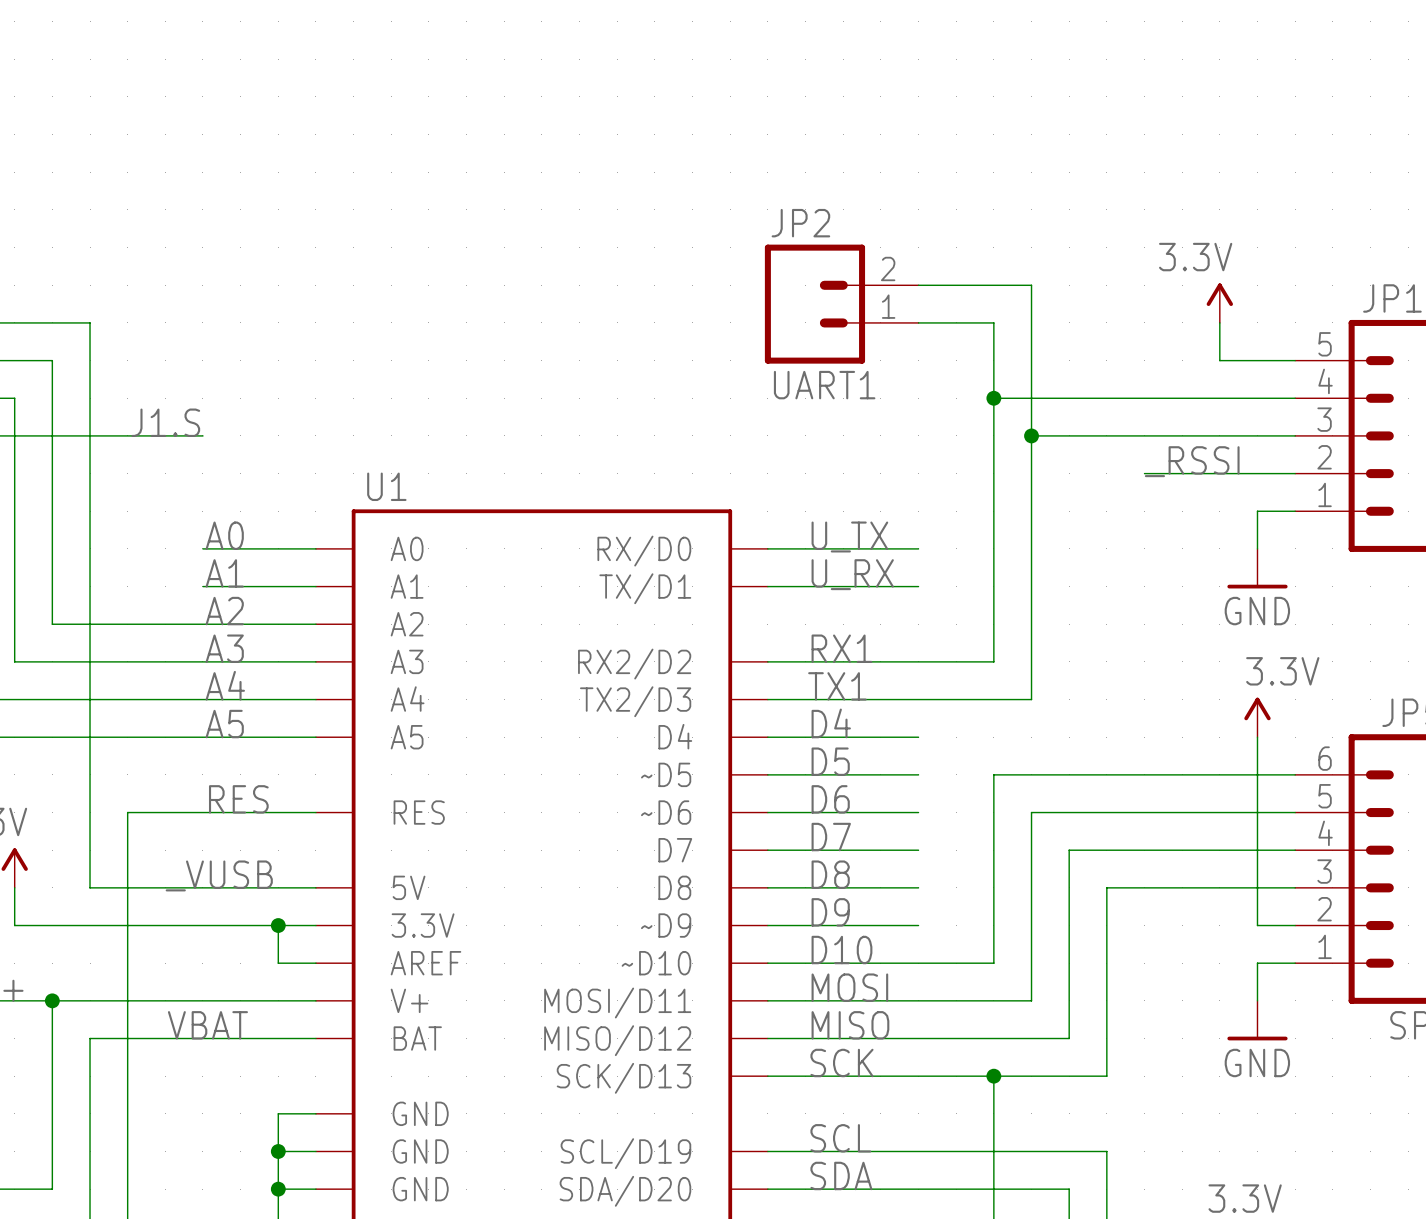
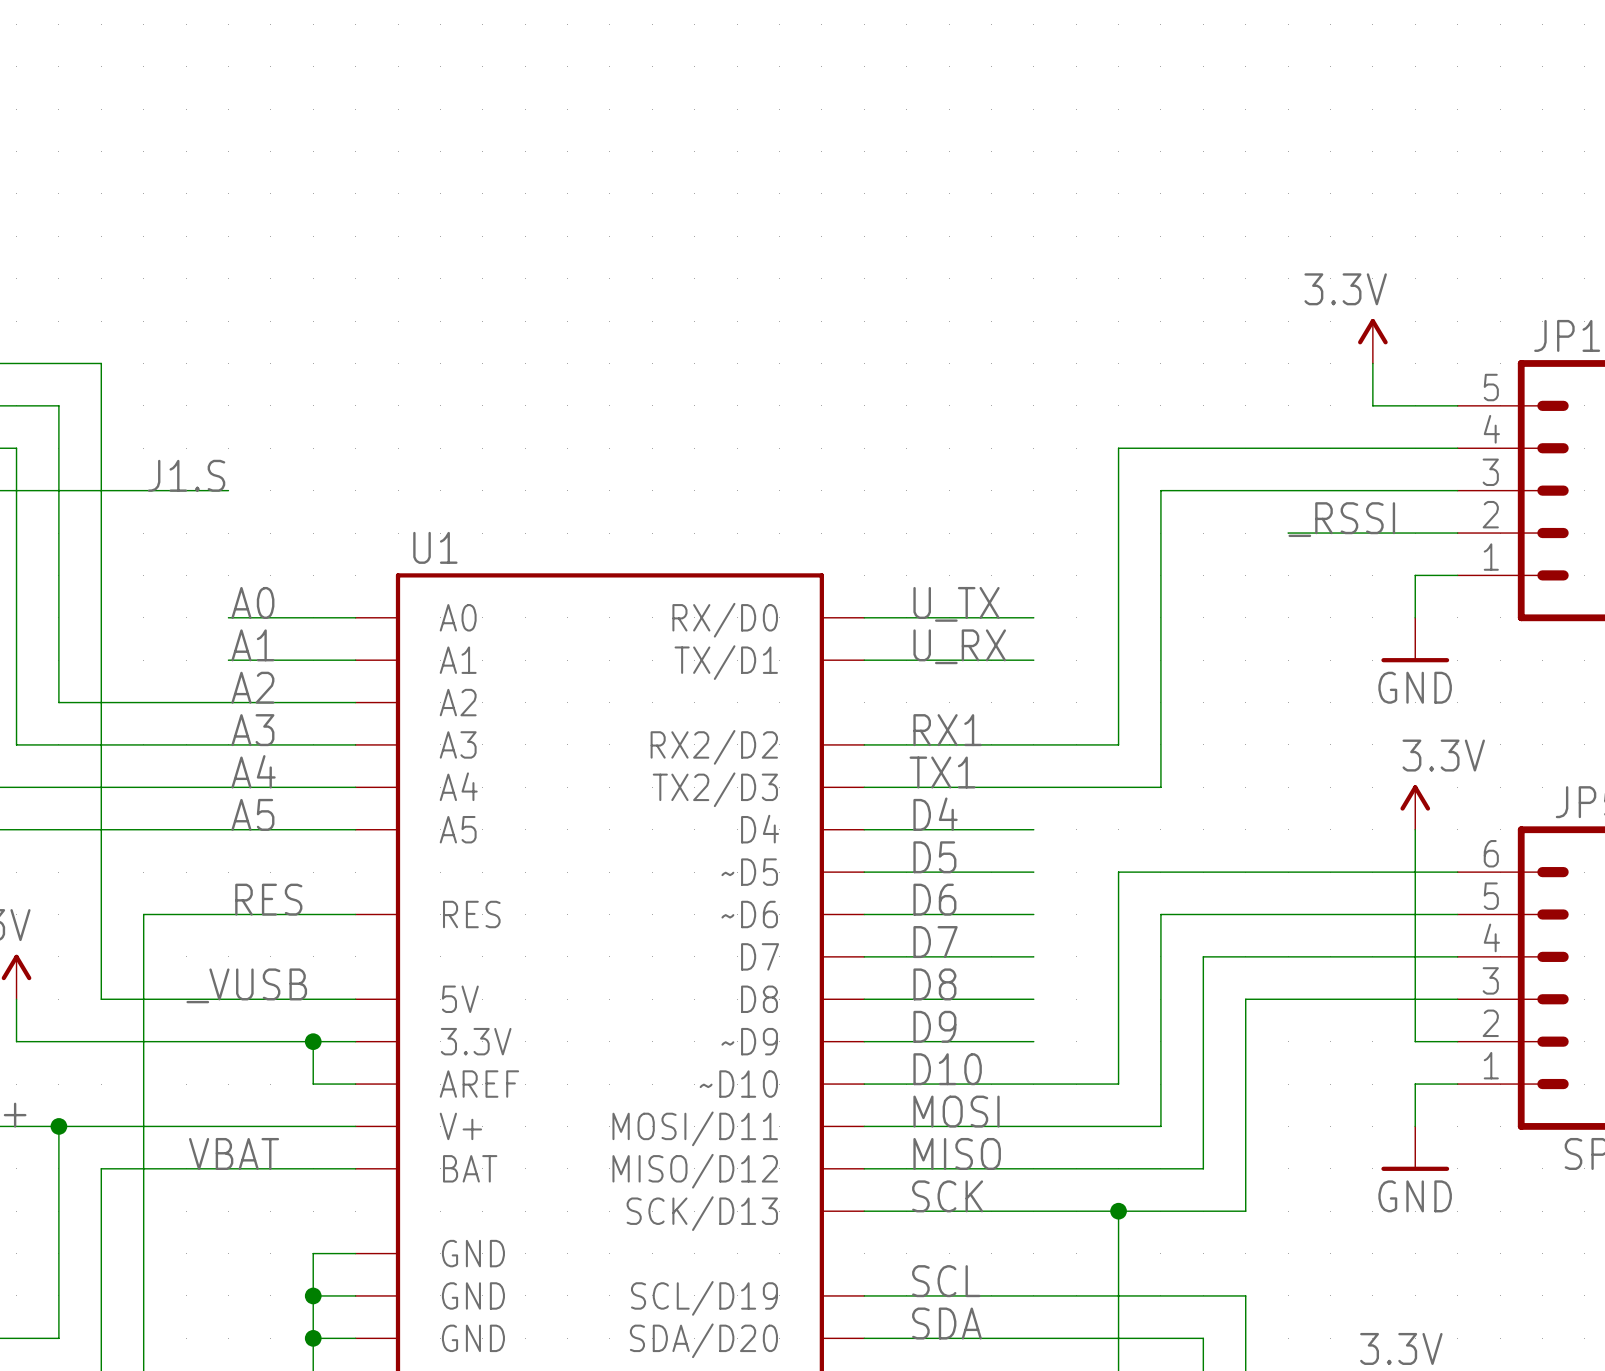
wire: (918, 285) (1031, 285) (1031, 435) -> none
JP2: UART1 (841, 304) -> none
wire: (918, 322) (993, 322) (993, 398) -> none
junction: (993, 398) -> none
junction: (1031, 435) -> none

